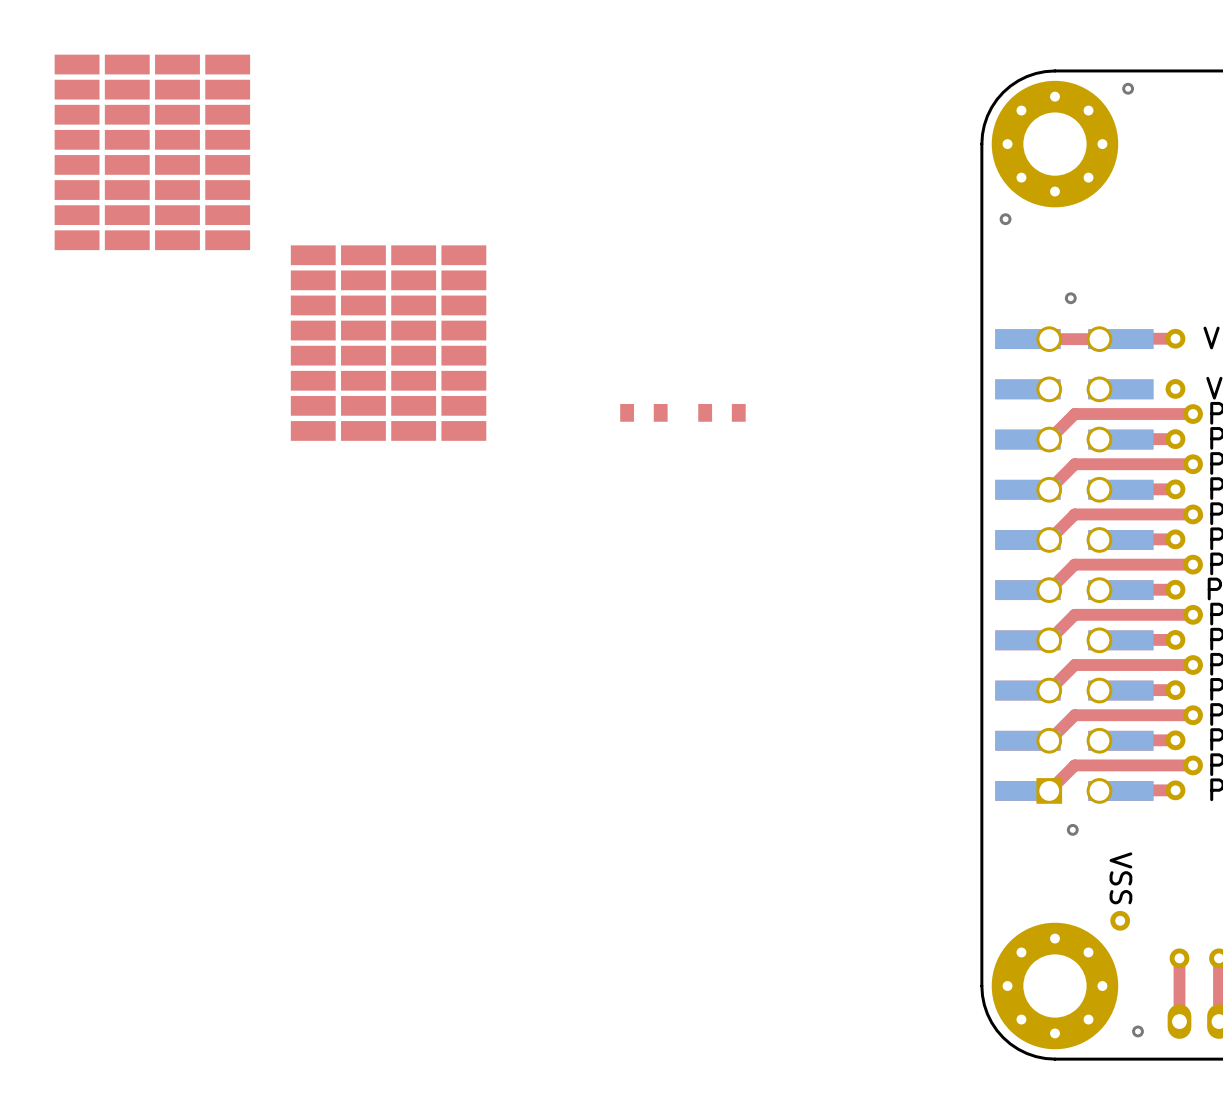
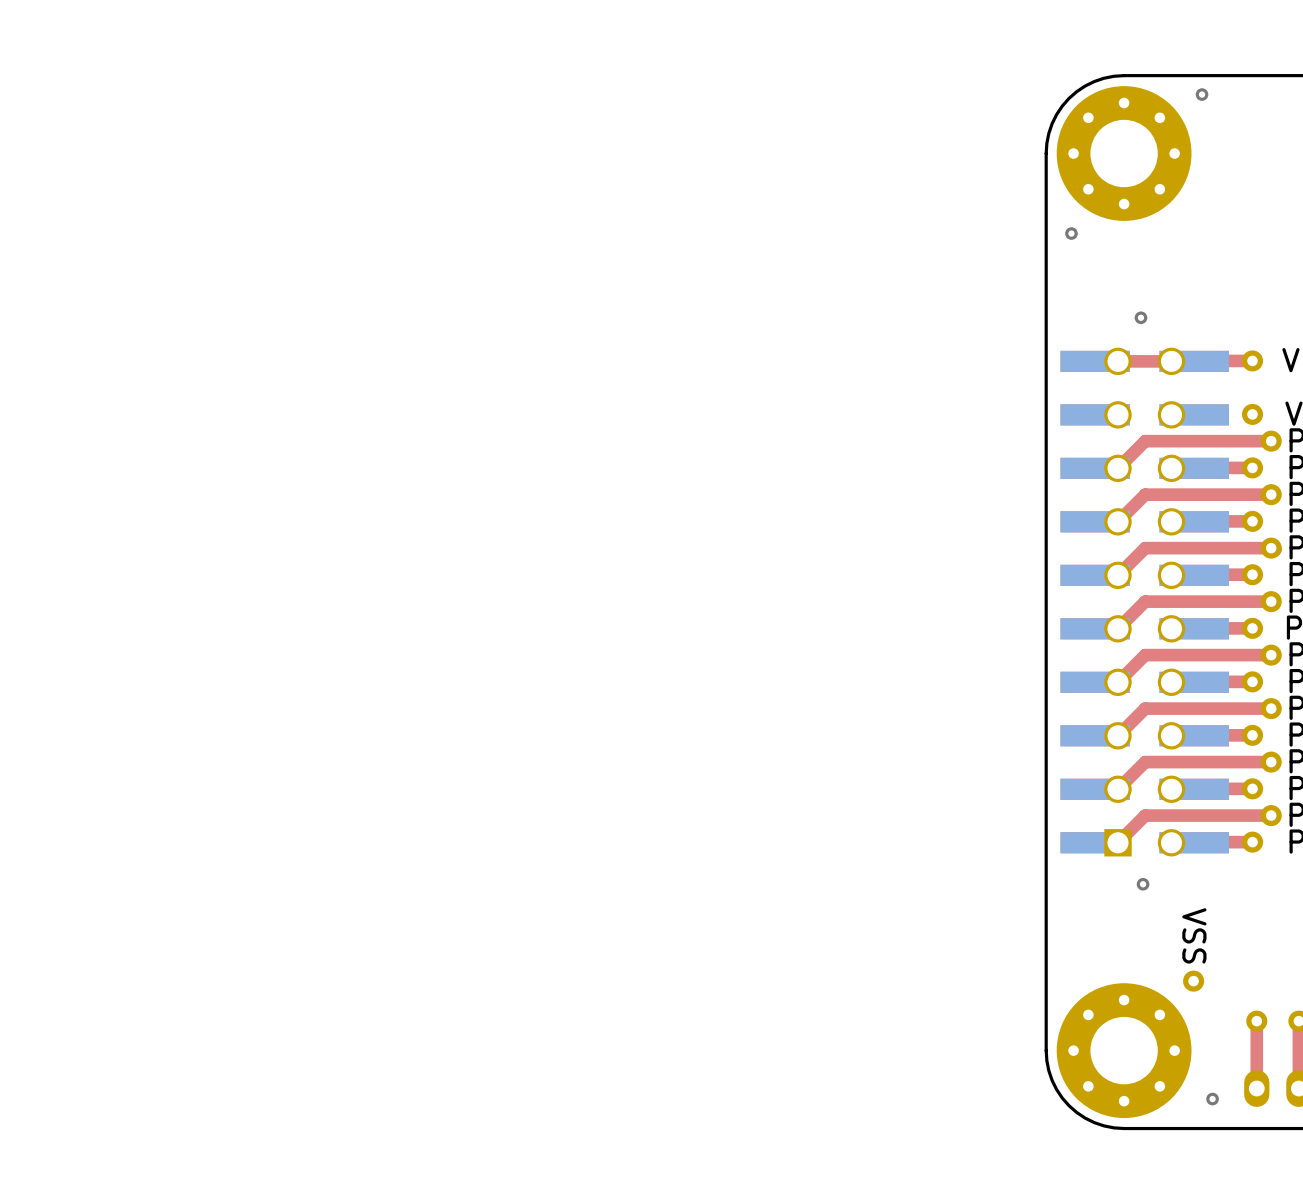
part: (152, 152) -> none
part: (388, 343) -> none
part: (643, 412) -> none
part: (721, 412) -> none

